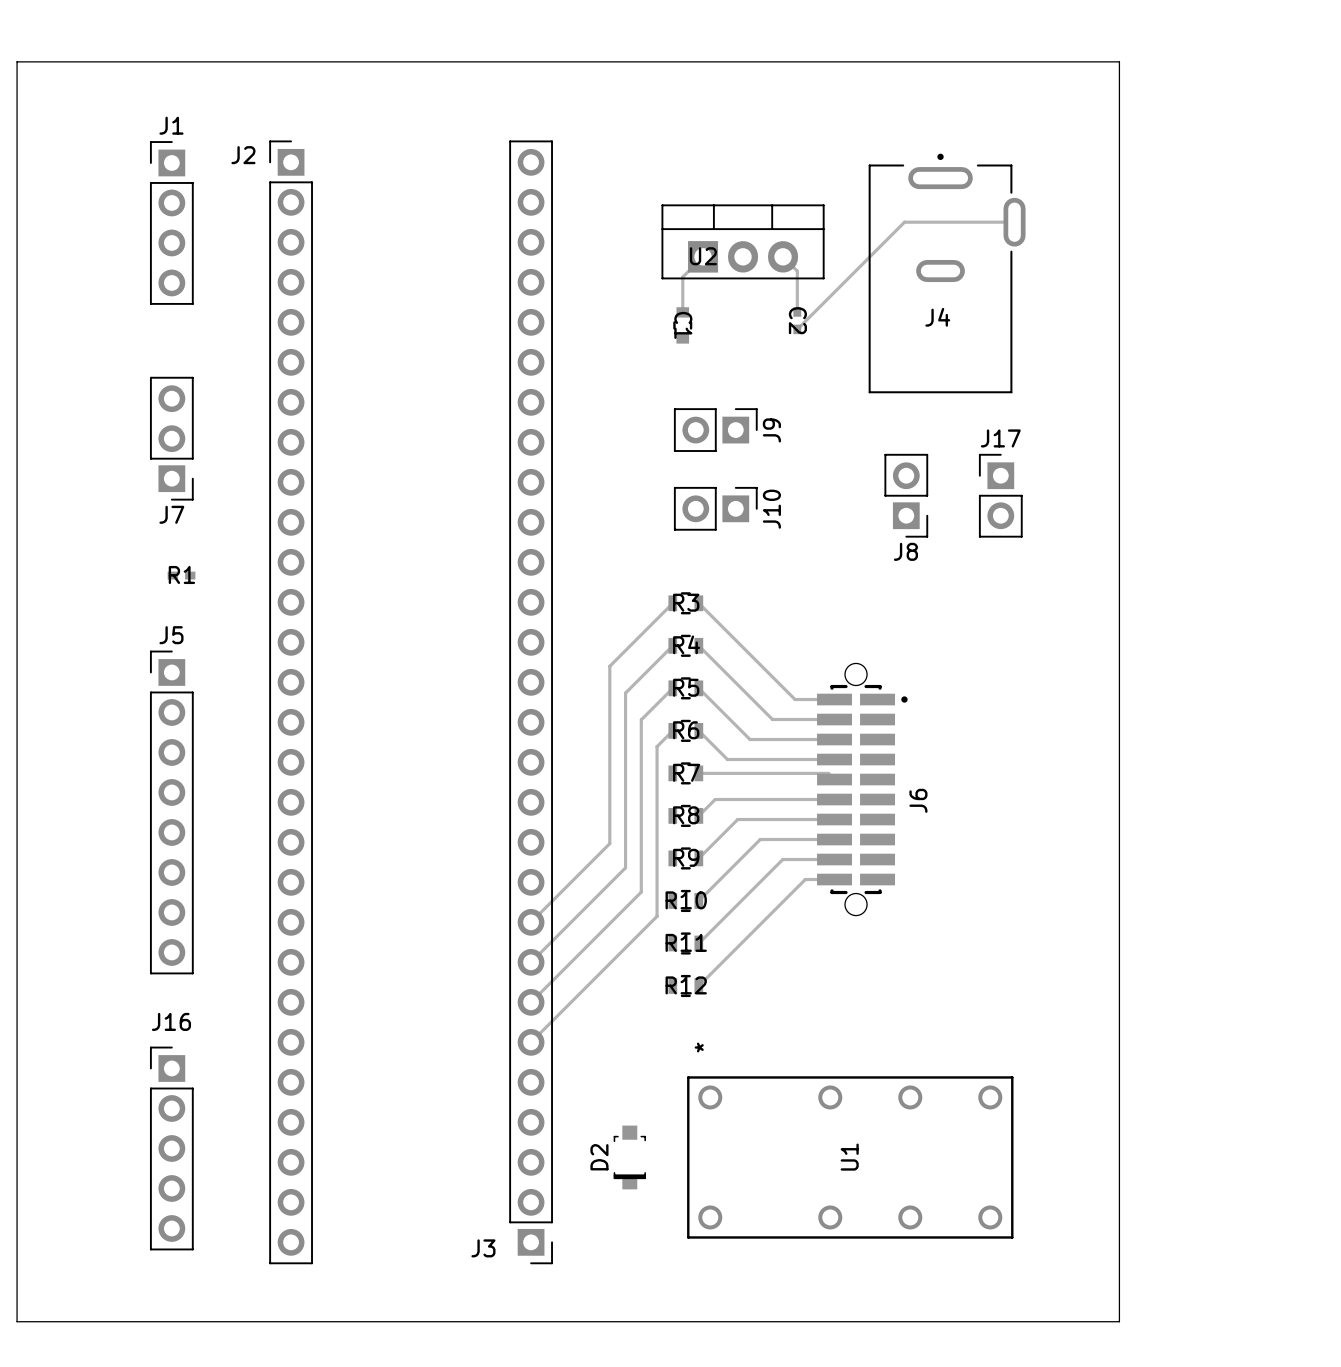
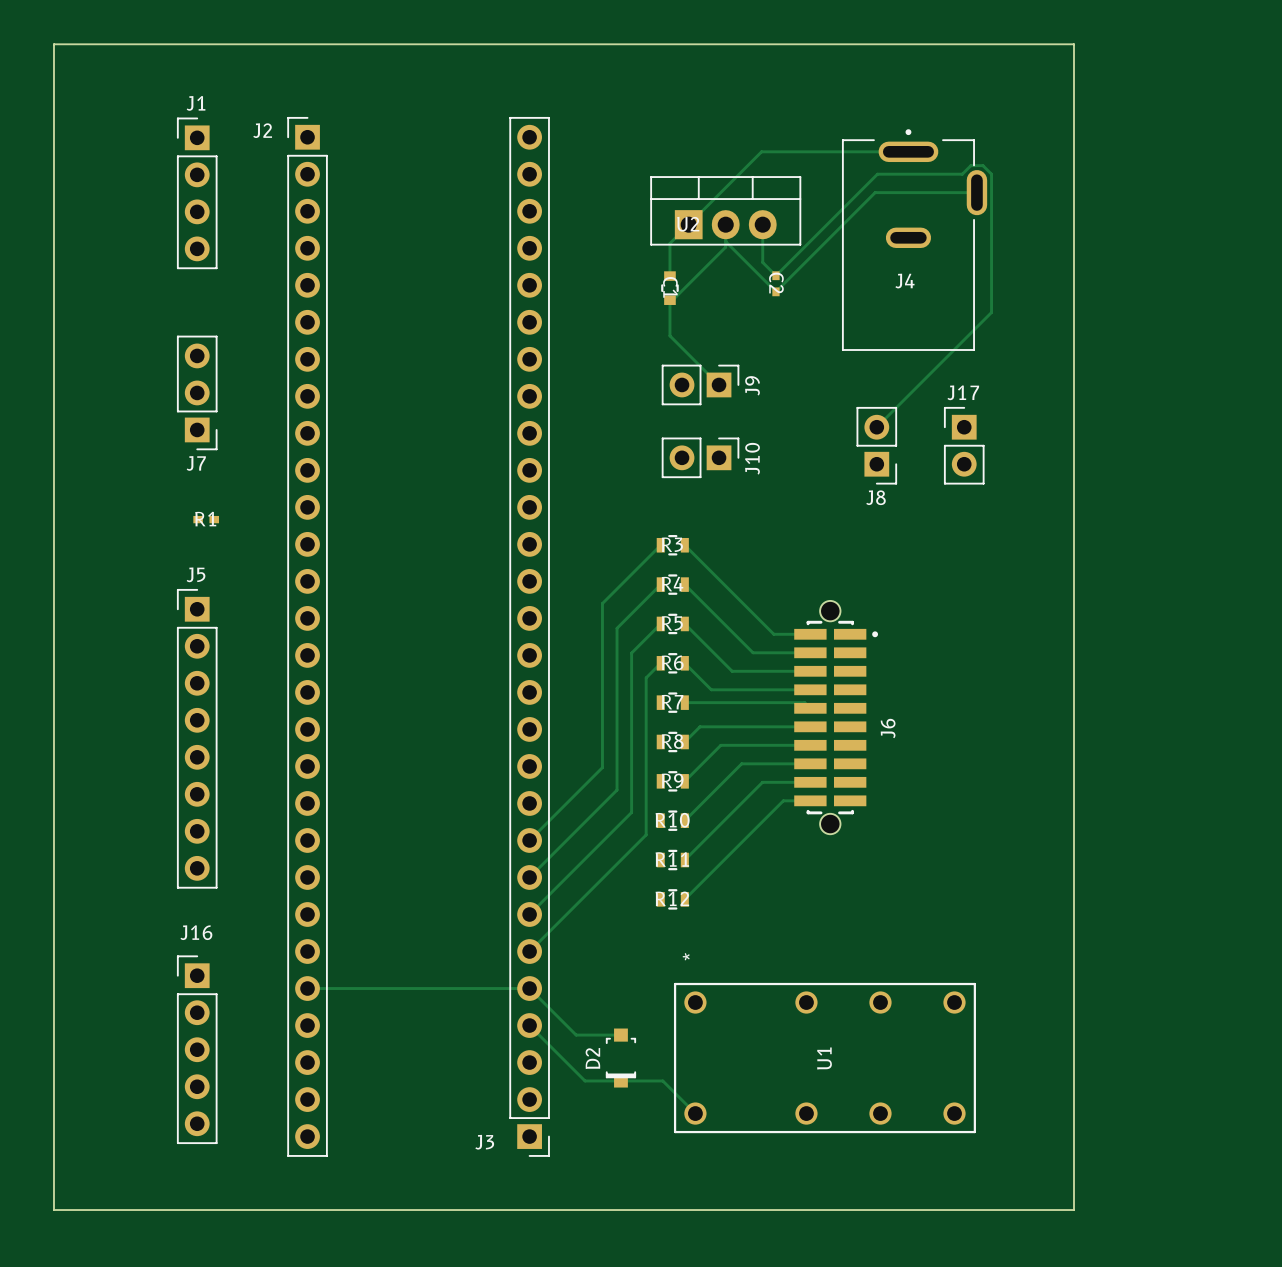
track: none -> (908, 151) (761, 151) (688, 224)
track: none -> (725, 224) (725, 247) (672, 300)
track: (783, 256) (797, 271) (797, 311) -> (762, 224) (762, 262) (775, 275) (877, 174) (962, 174) (970, 165) (982, 165) (991, 174) (991, 312) (876, 427)
track: none -> (725, 241) (775, 291)
track: none -> (669, 300) (669, 335) (719, 384)
track: none -> (307, 988) (529, 988) (576, 1035) (620, 1035)
track: none -> (529, 1025) (585, 1080) (662, 1080) (695, 1113)

